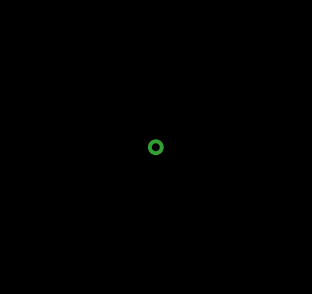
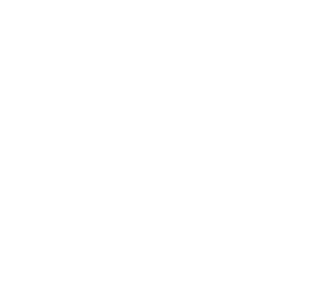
via: (155, 147) -> none

